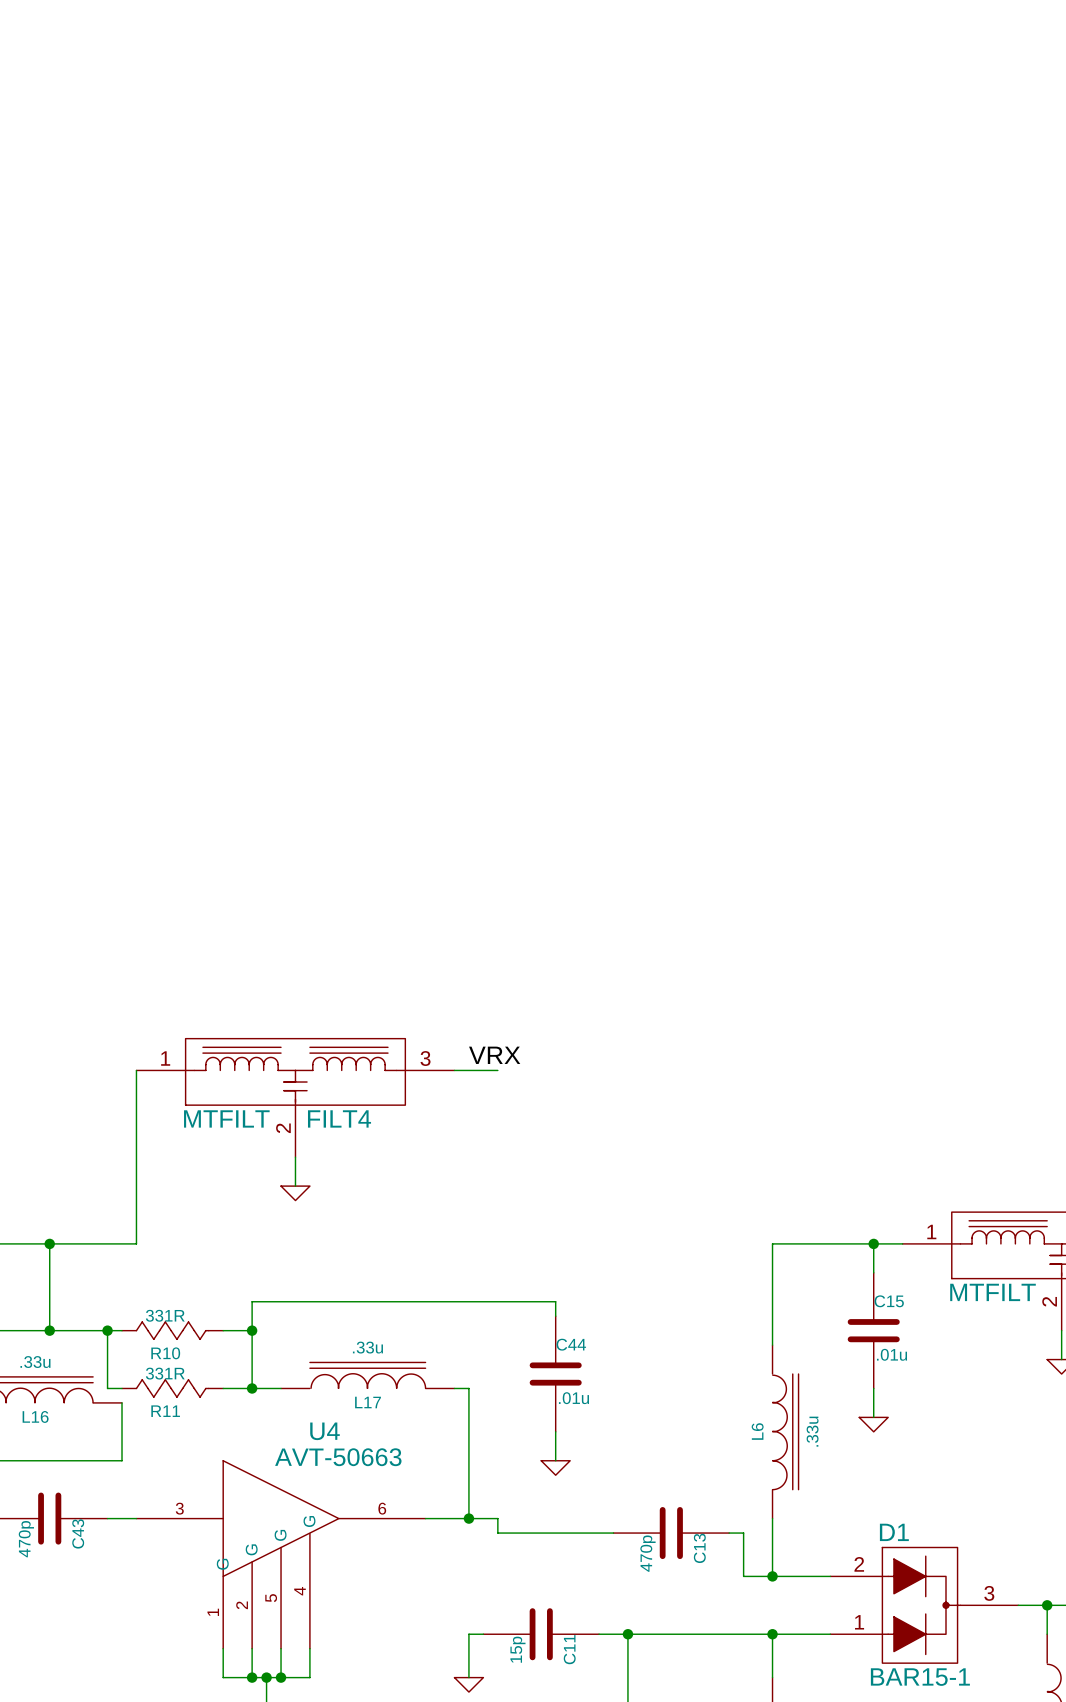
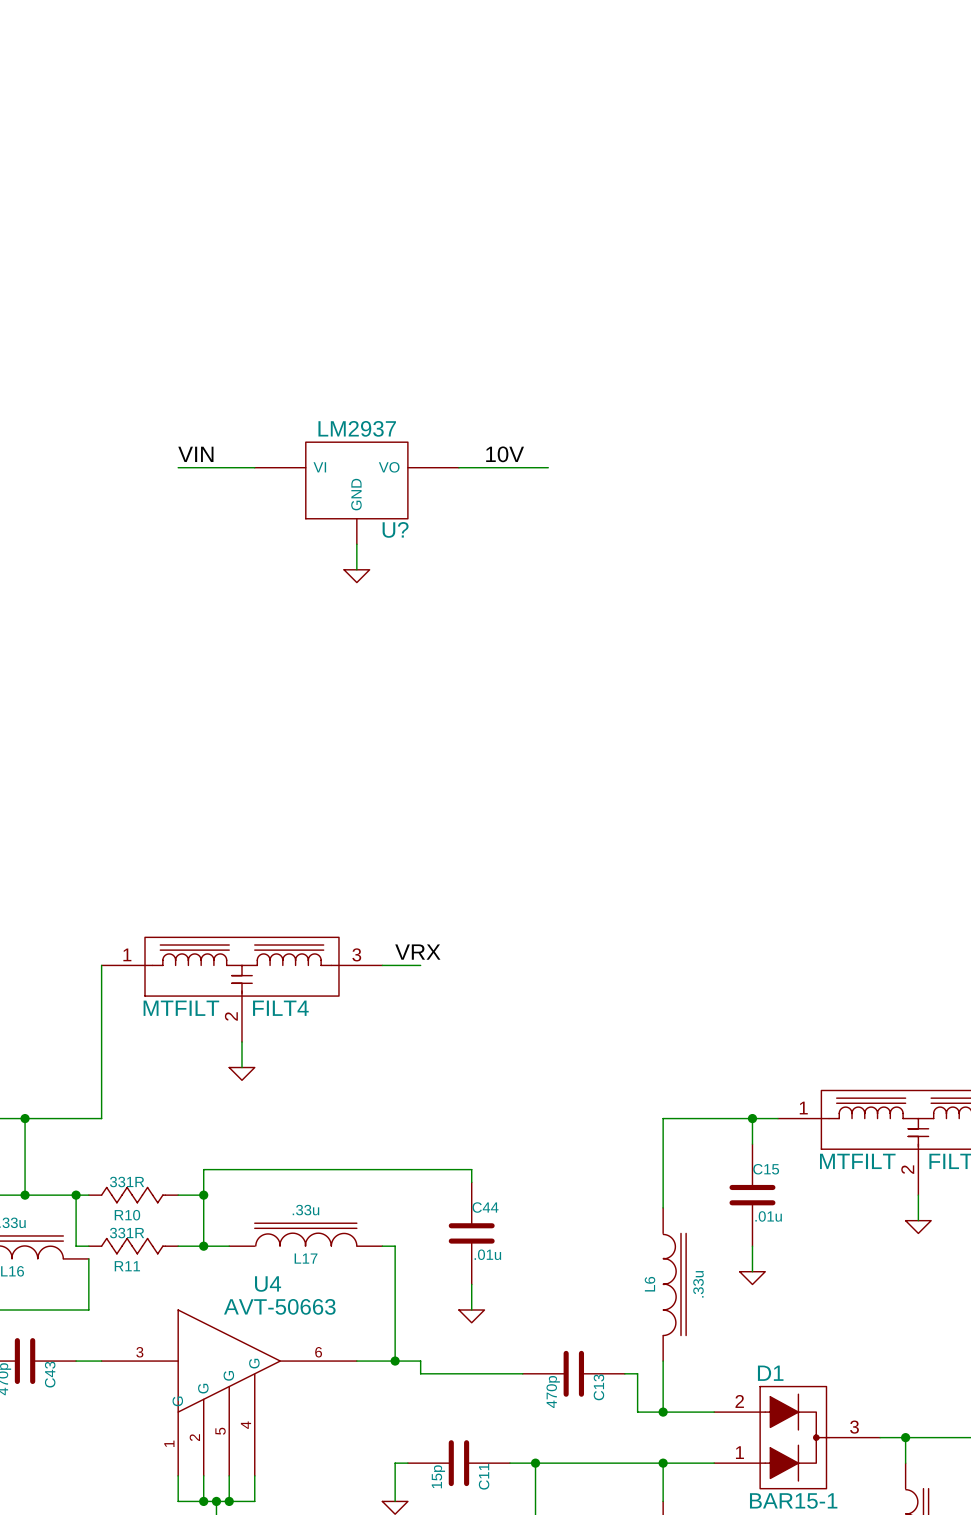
label: none -> VIN (195, 454)
label: none -> 10V (505, 454)
wire: none -> (178, 467) (254, 467)
wire: none -> (458, 467) (548, 467)
U?: none -> LM2937 (356, 493)
wire: none -> (356, 544) (356, 569)
power symbol: none -> (356, 576)

